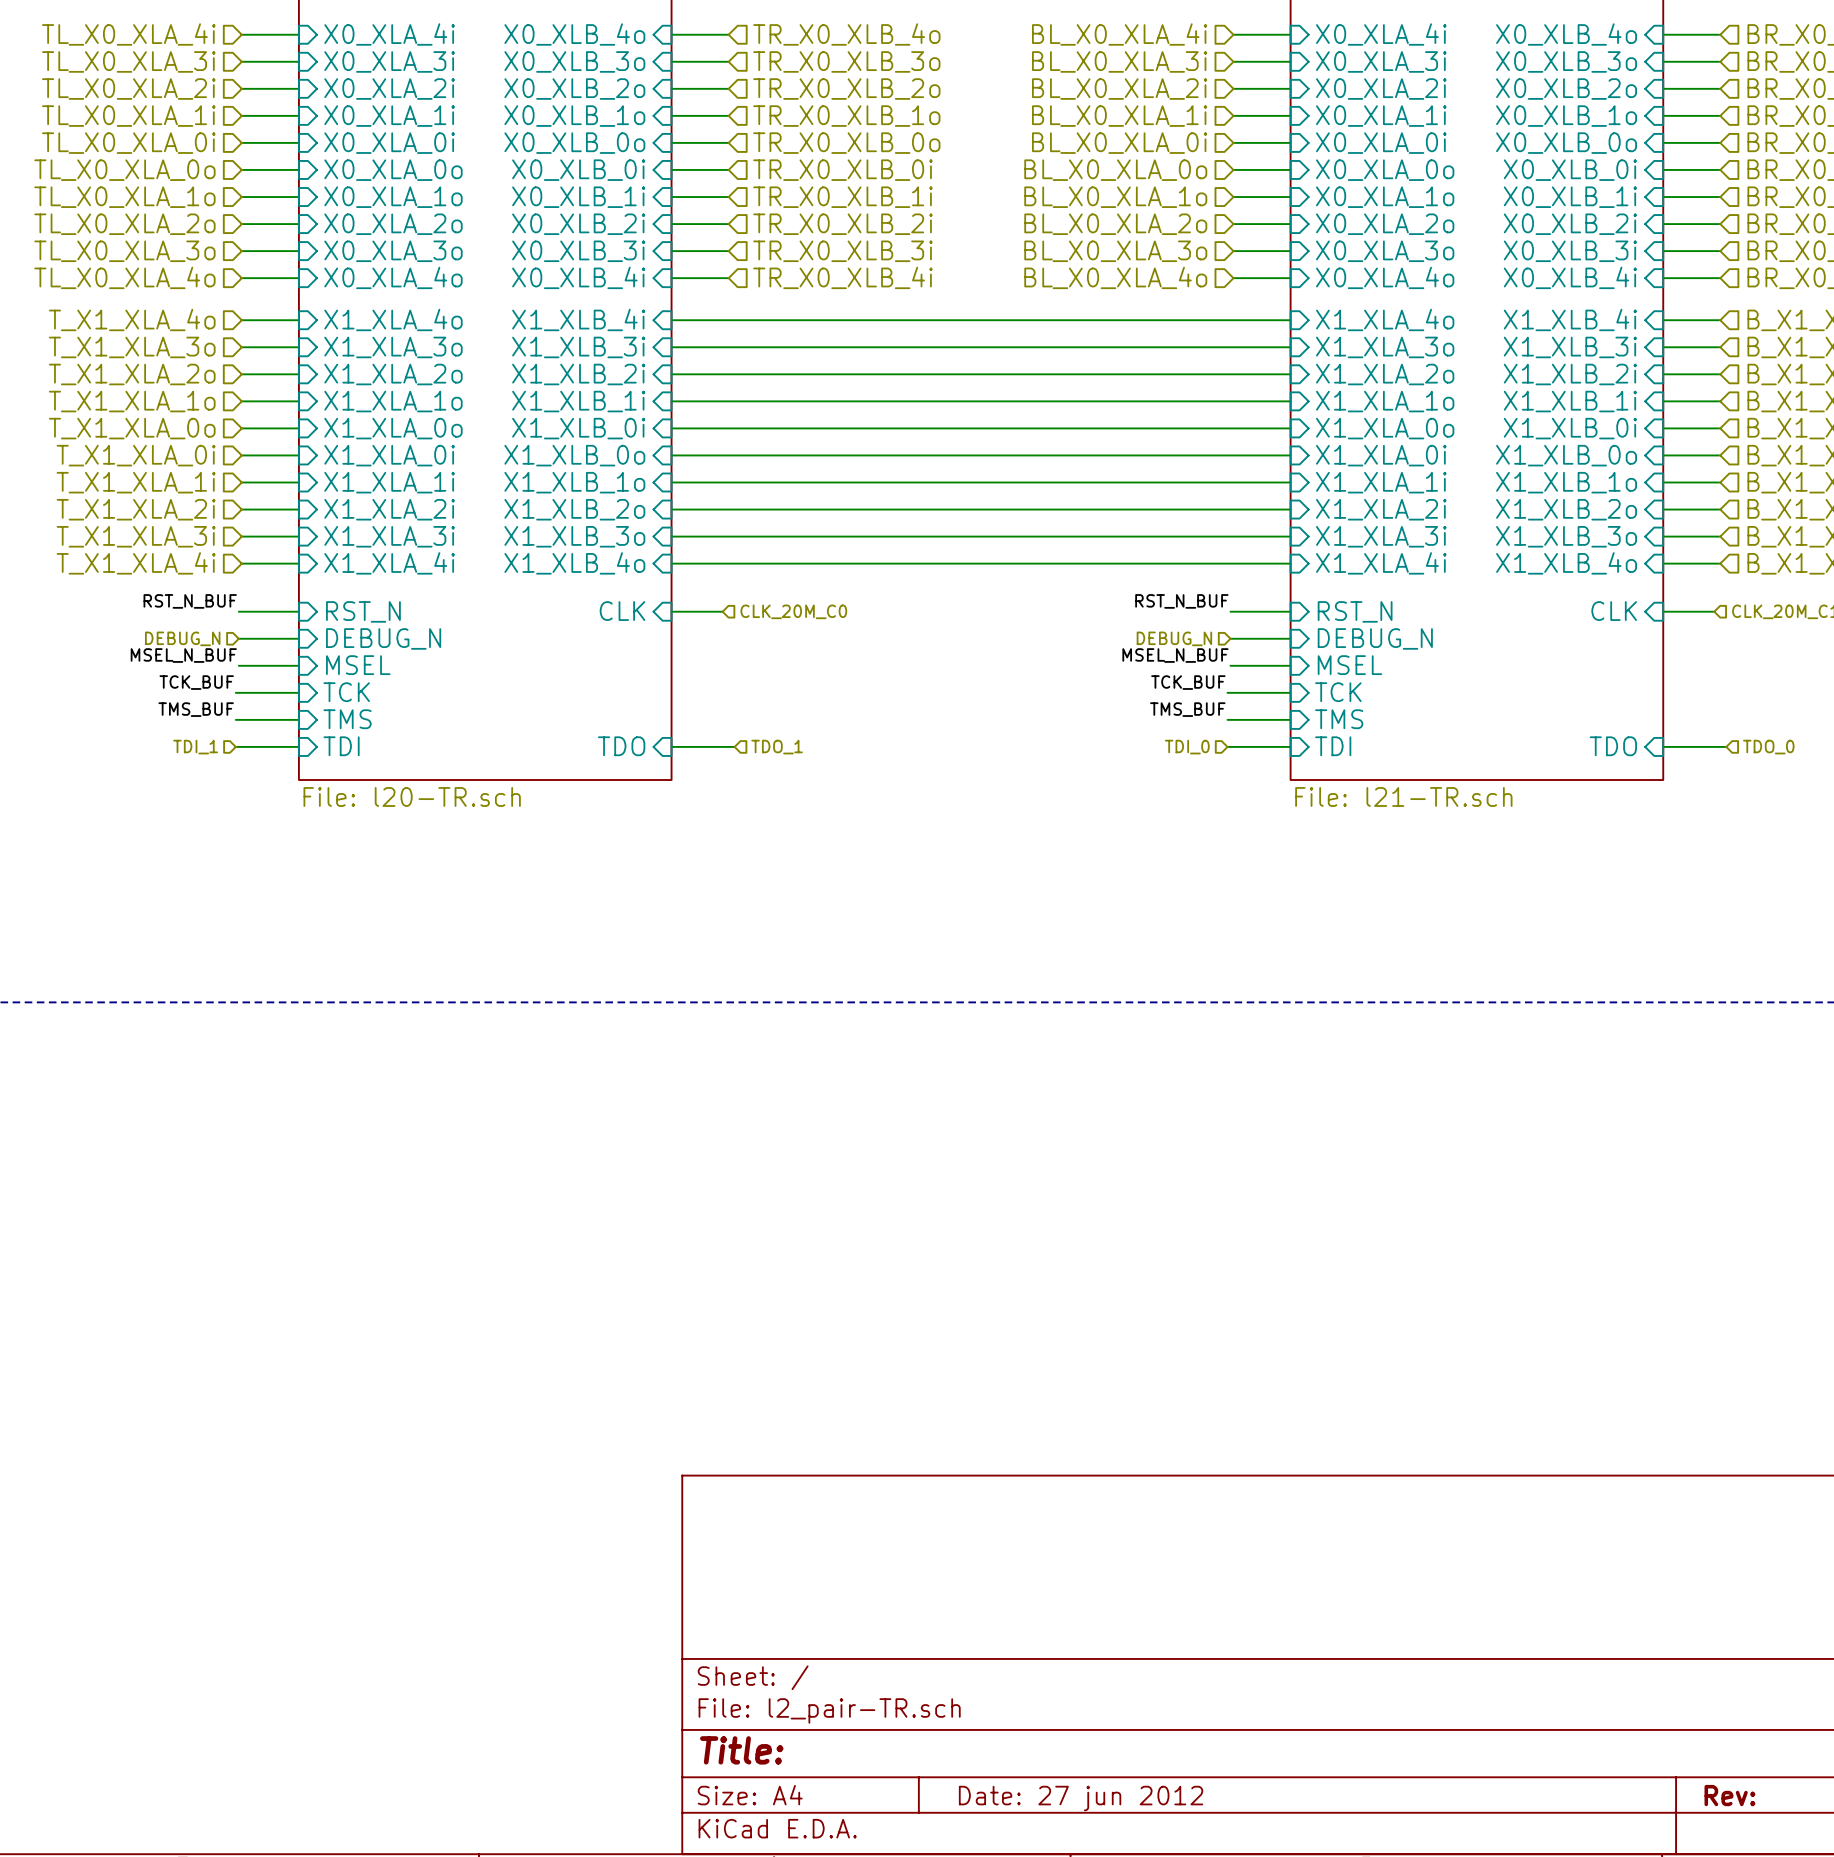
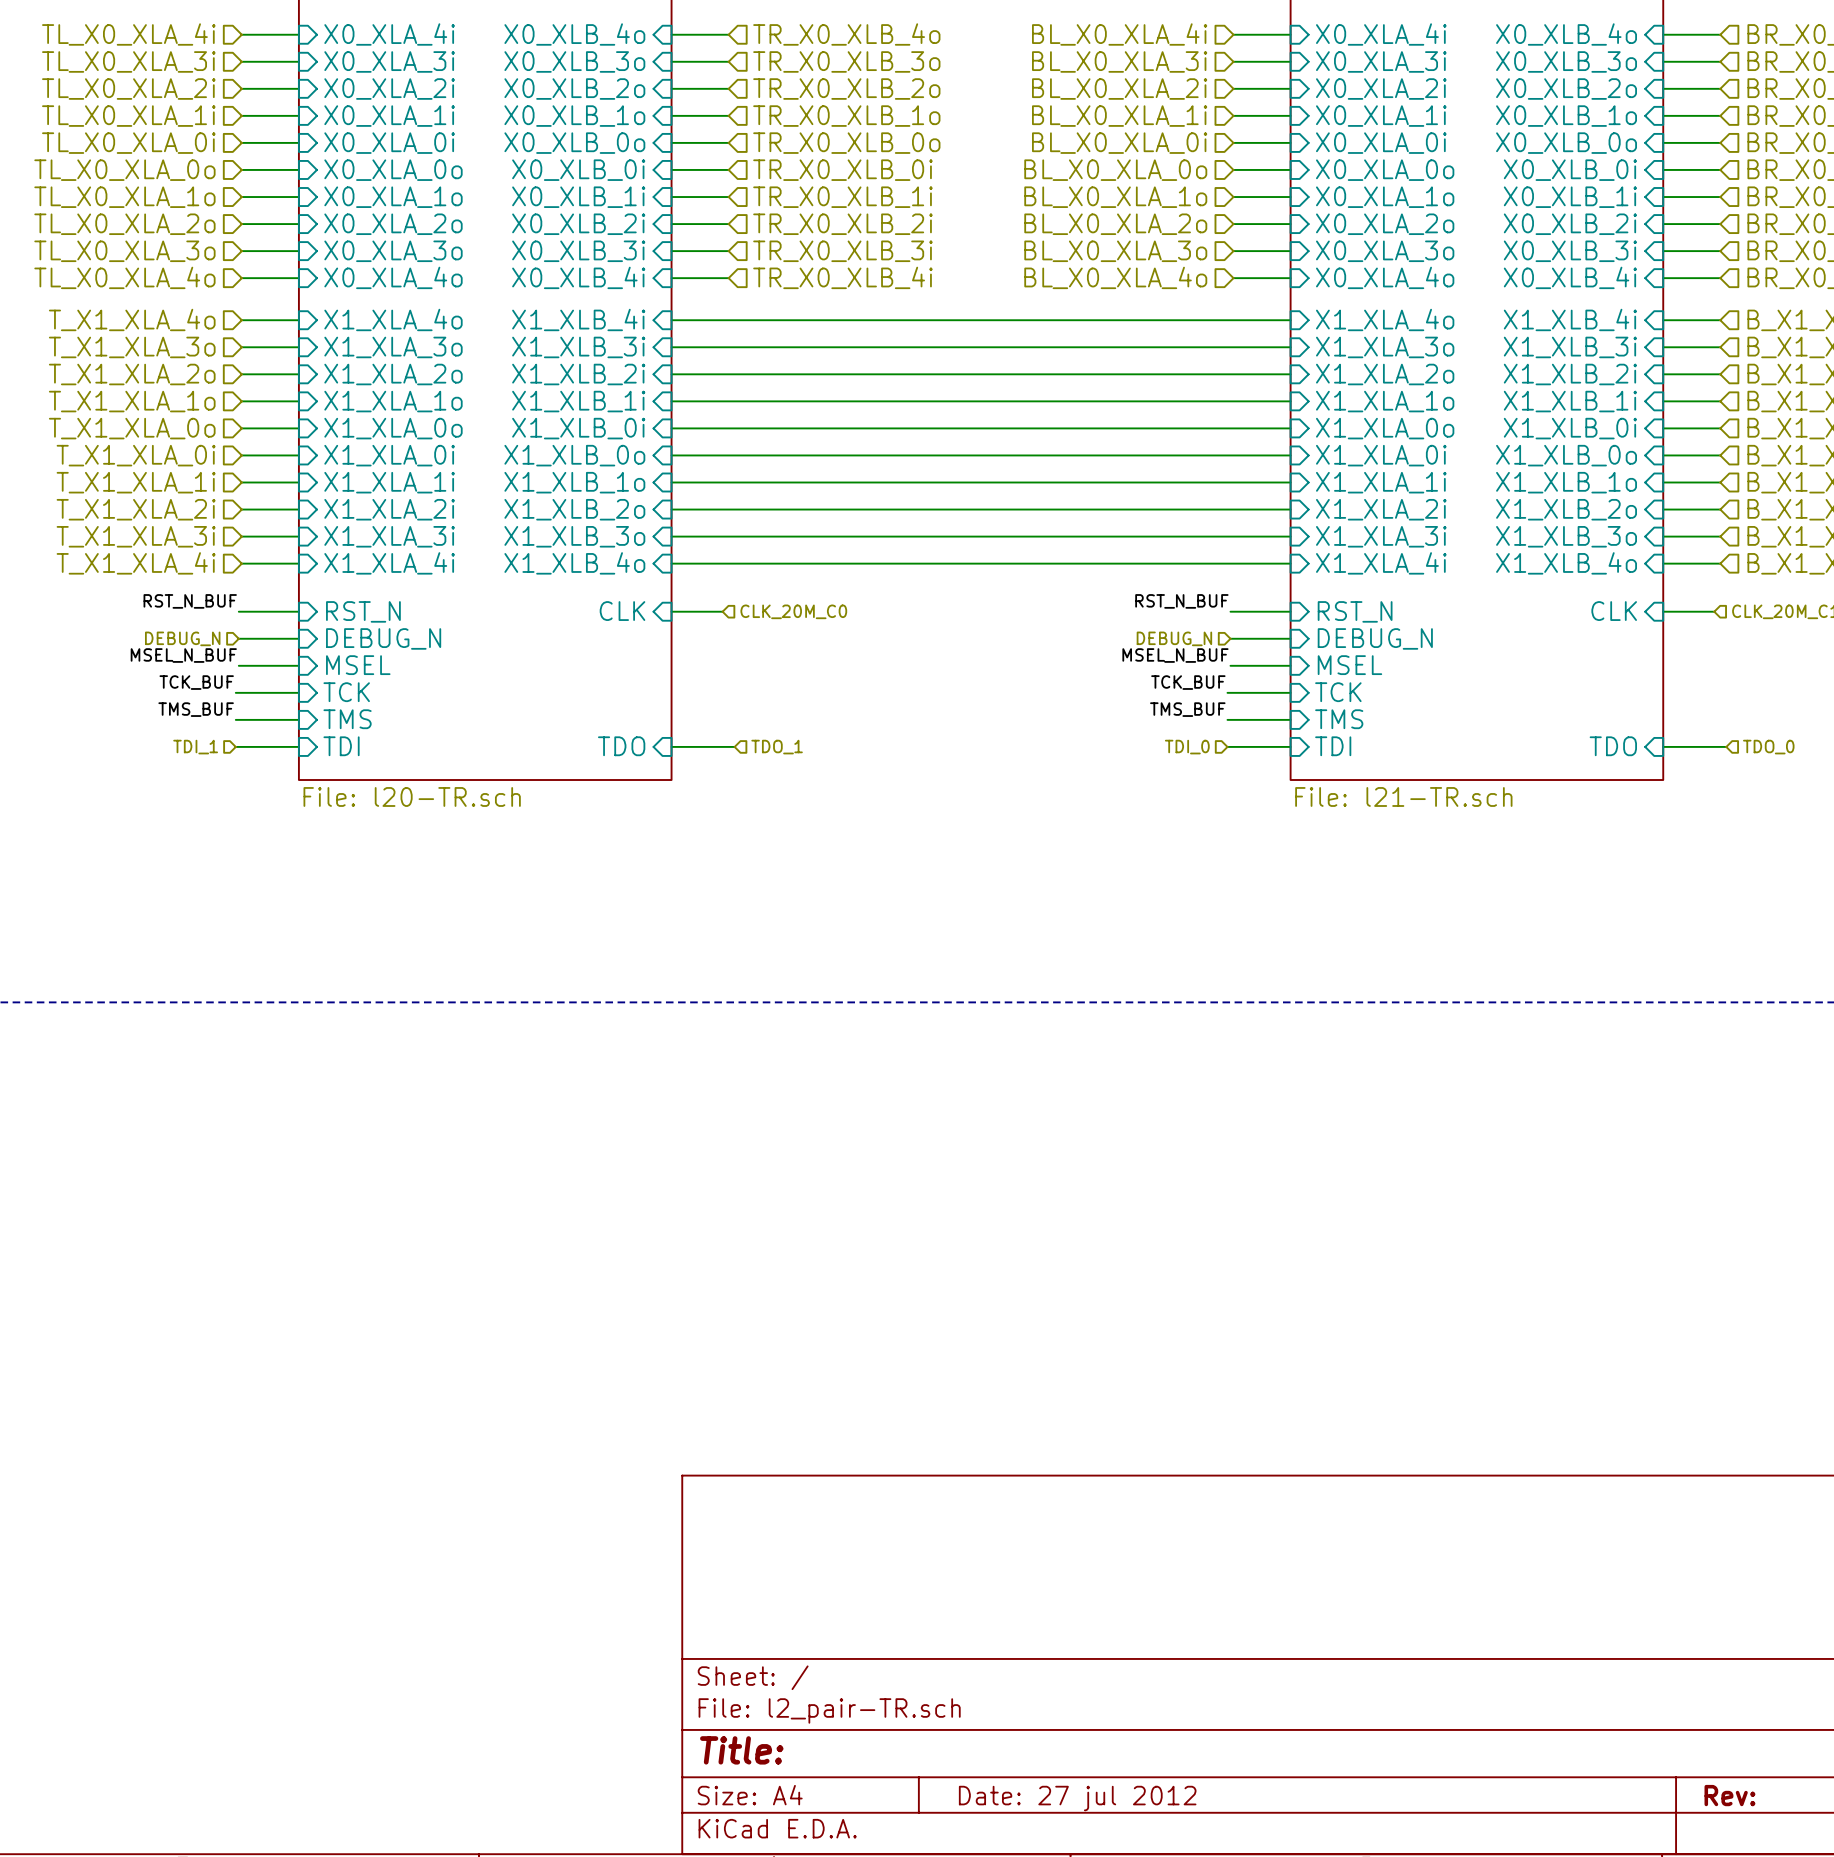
title block: Date: 27 jun 2012 (1081, 1798) -> Date: 27 jul 2012 (1077, 1798)

